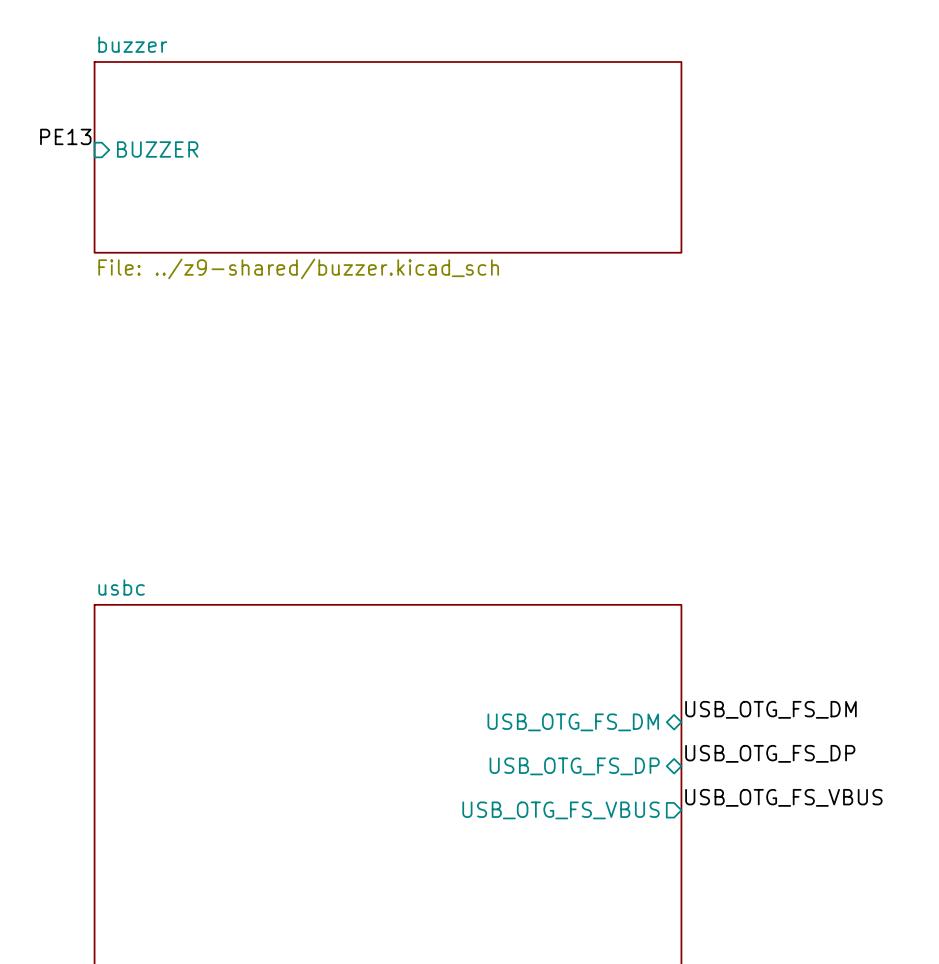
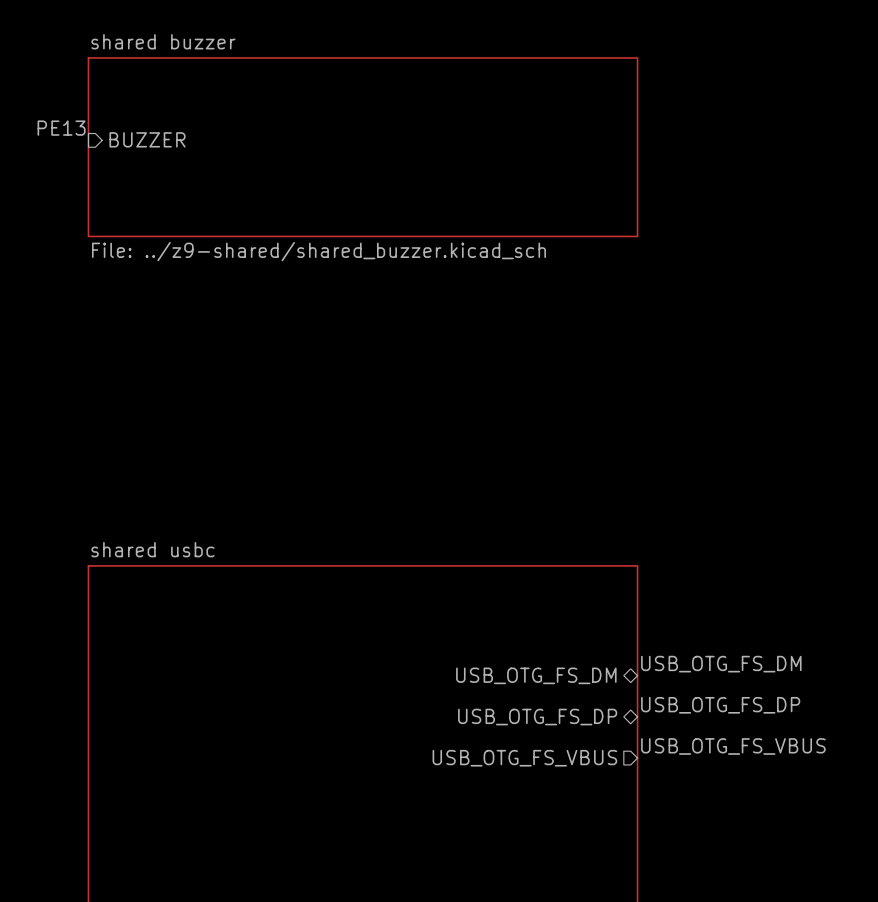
sheet buzzer name: buzzer (132, 44) -> shared buzzer (163, 41)
sheet buzzer value: File: ../z9-shared/buzzer.kicad_sch (298, 268) -> File: ../z9-shared/shared_buzzer.kicad_sch (318, 251)
sheet usbc name: usbc (121, 587) -> shared usbc (152, 549)

